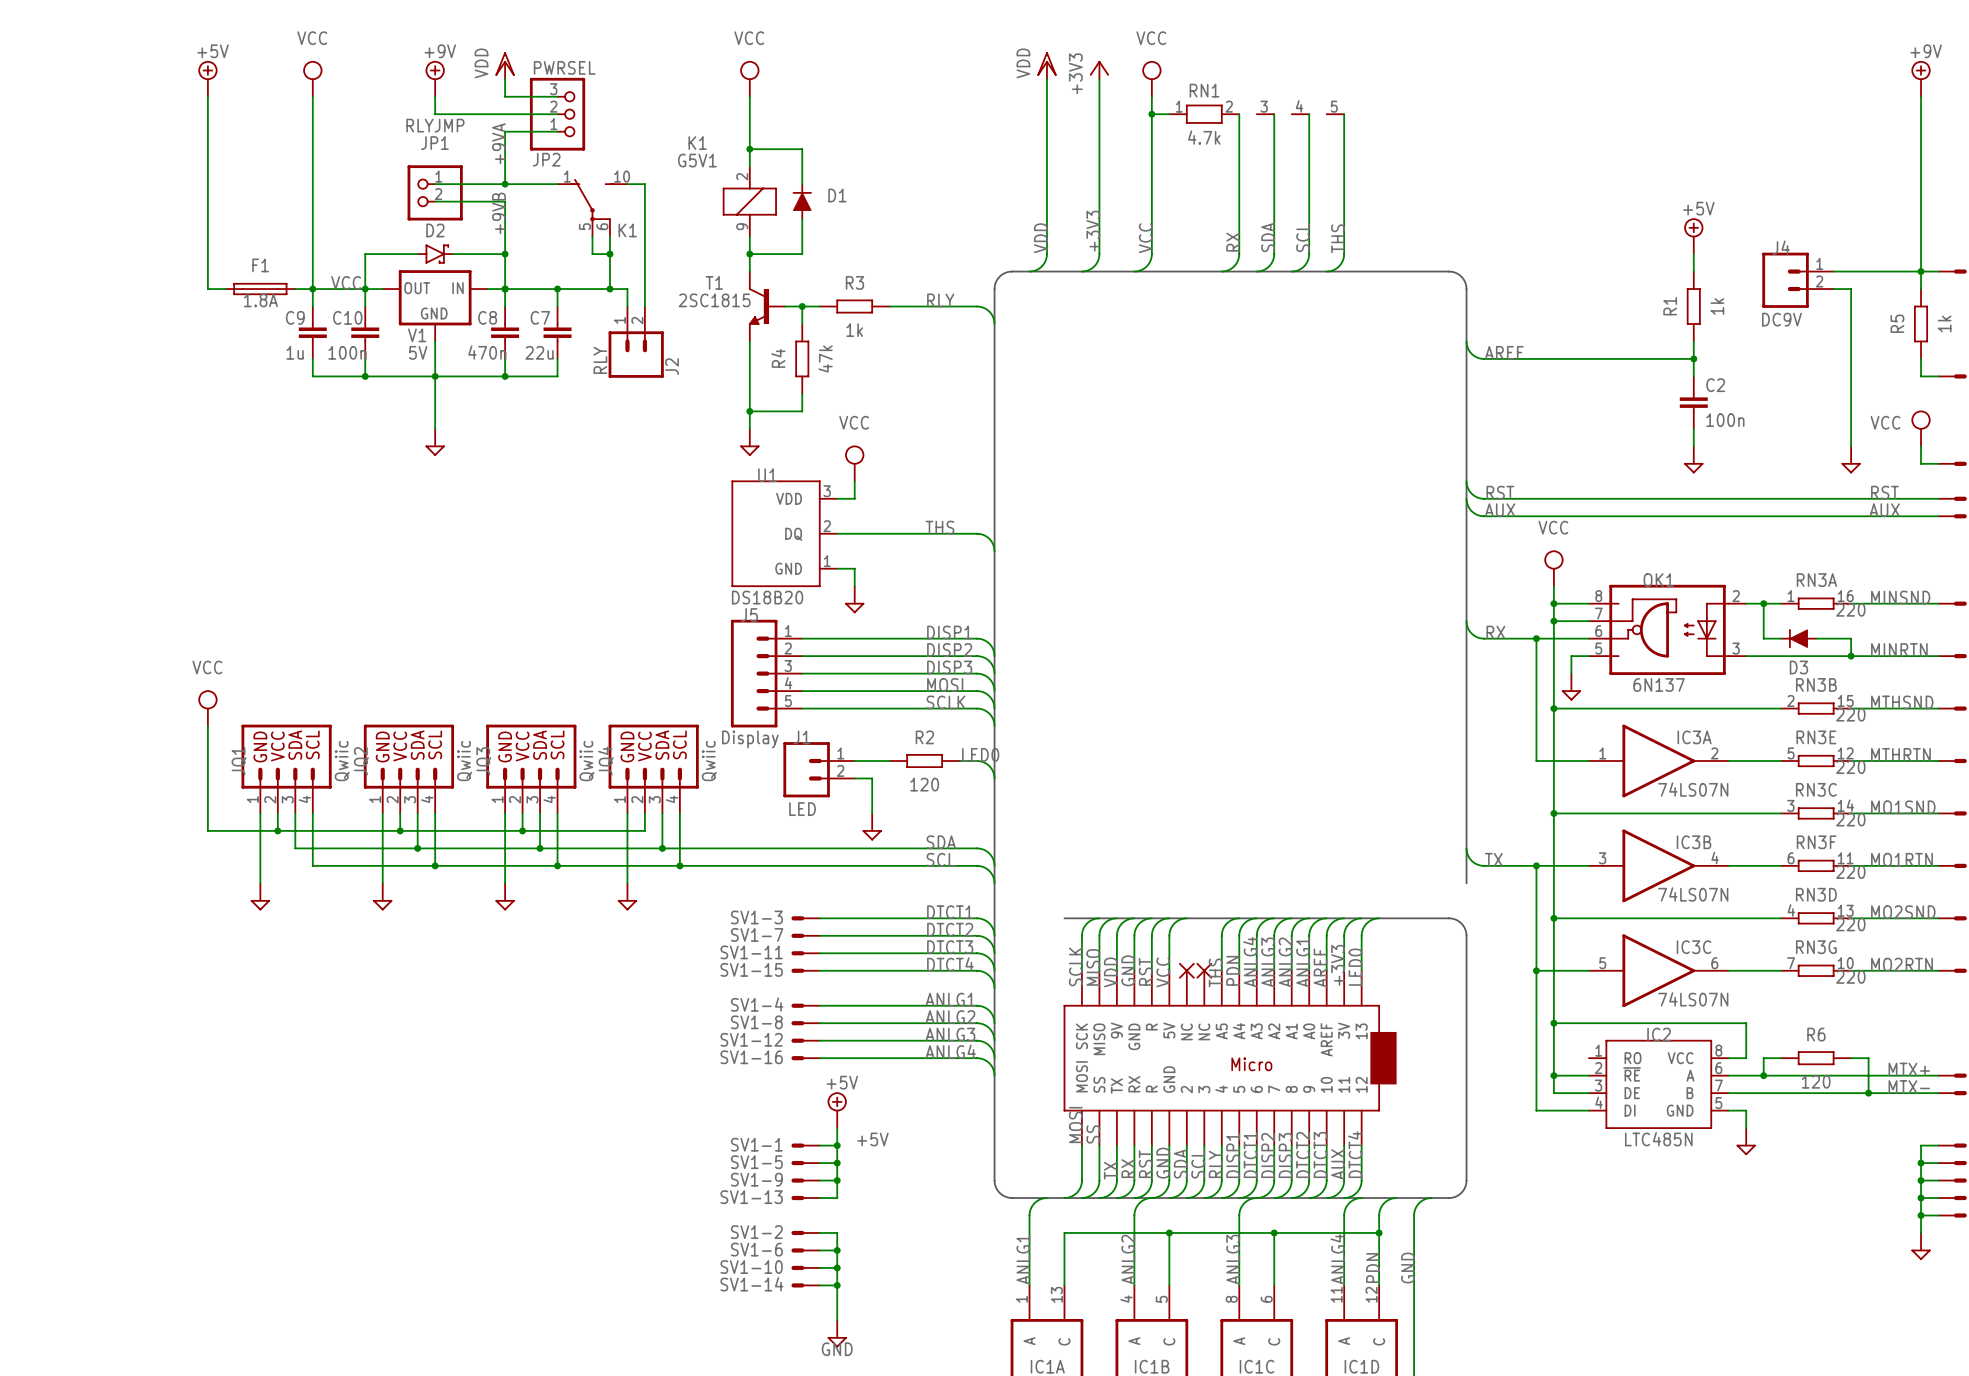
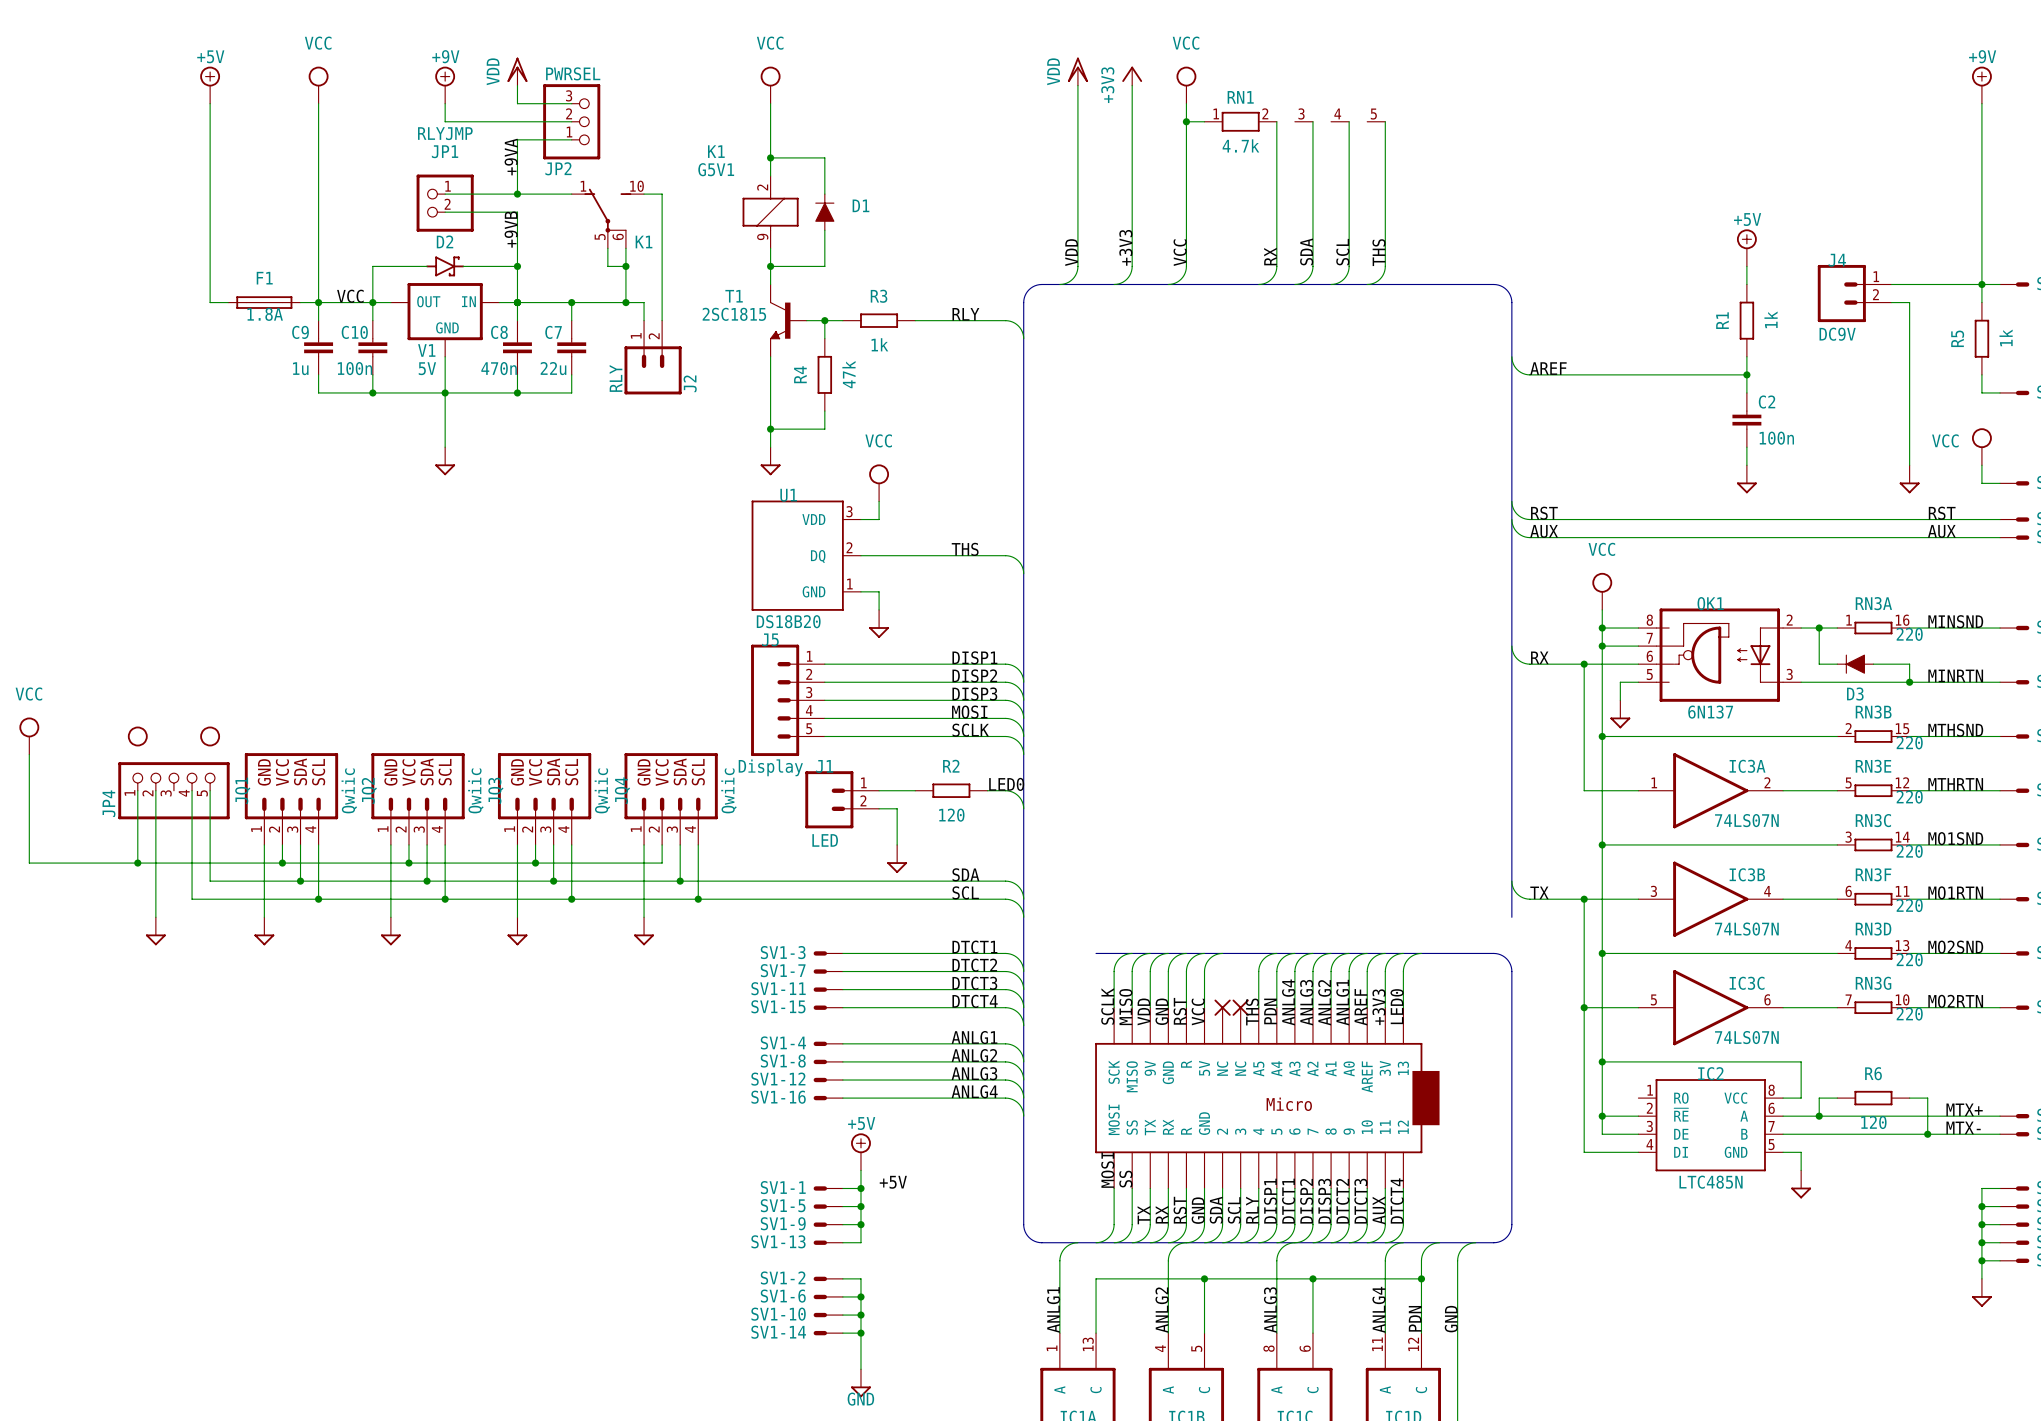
power symbol: none -> VCC (29, 736)
part: none -> (137, 736)
power symbol: VCC (207, 708) -> none
part: none -> (210, 736)
wire: none -> (29, 754) (29, 863) (210, 863) (210, 881) (300, 881)
wire: (207, 726) (207, 761) -> none
wire: none -> (137, 790) (137, 863)
wire: none -> (155, 790) (155, 917)
JP4: none -> (173, 790)
wire: none -> (192, 790) (192, 899) (318, 899)
junction: none -> (137, 863)
junction: none -> (300, 881)
junction: none -> (318, 899)
power symbol: none -> (155, 931)

